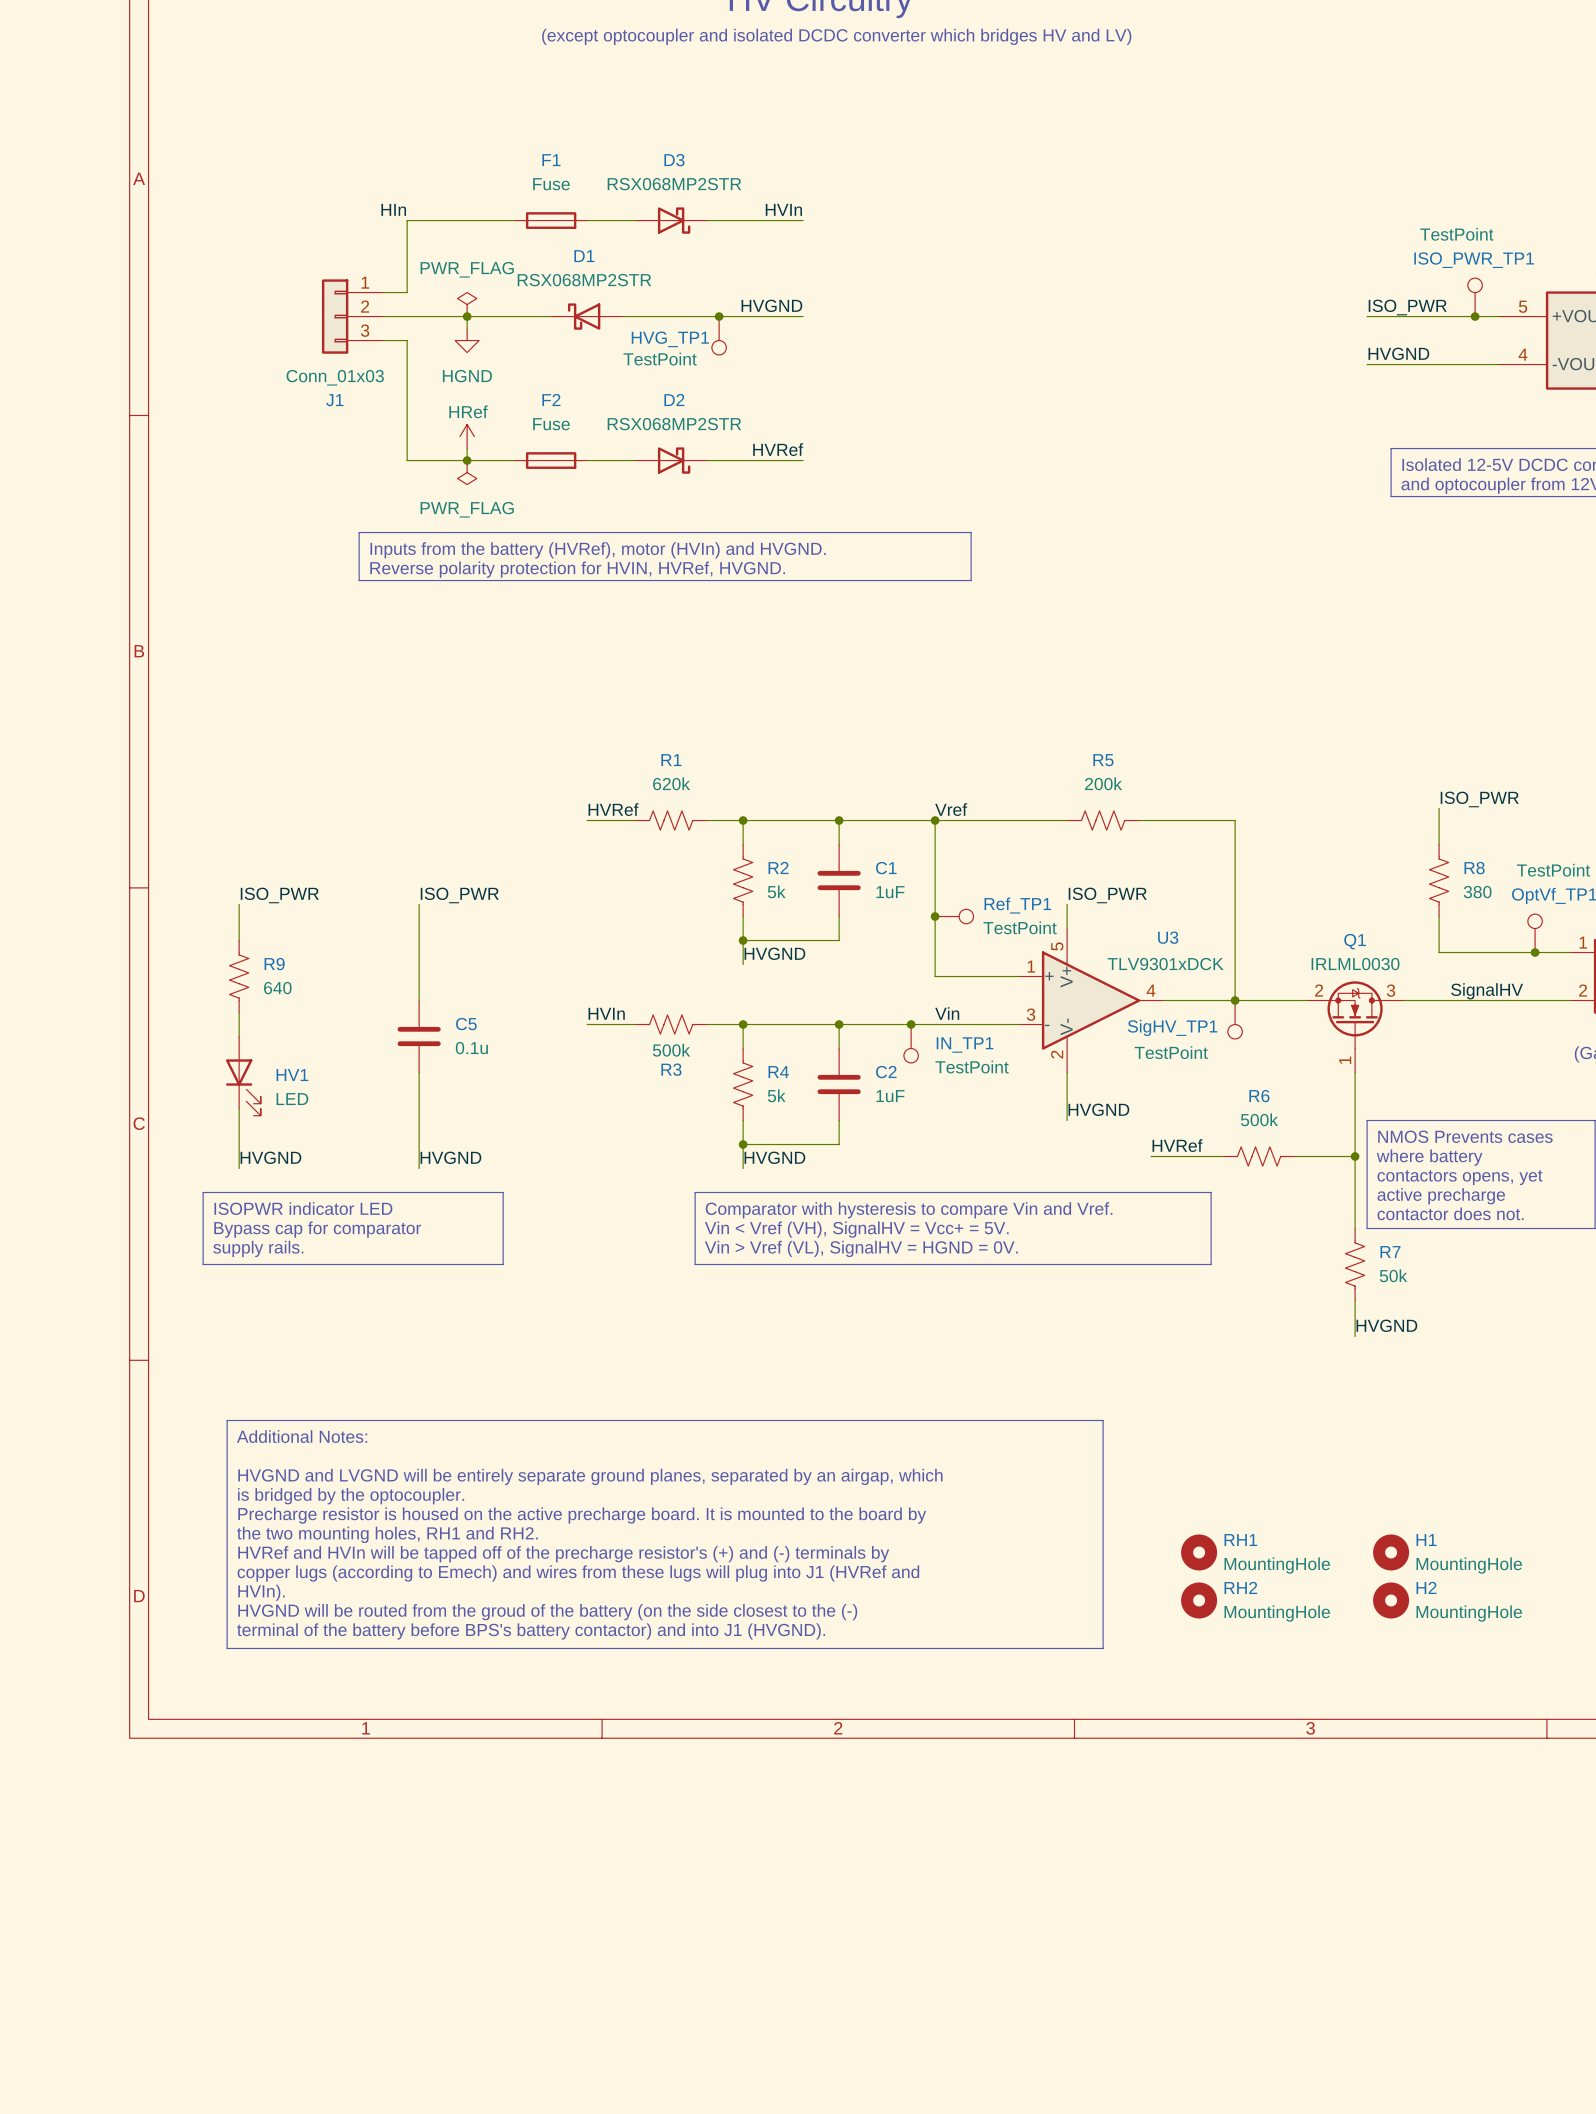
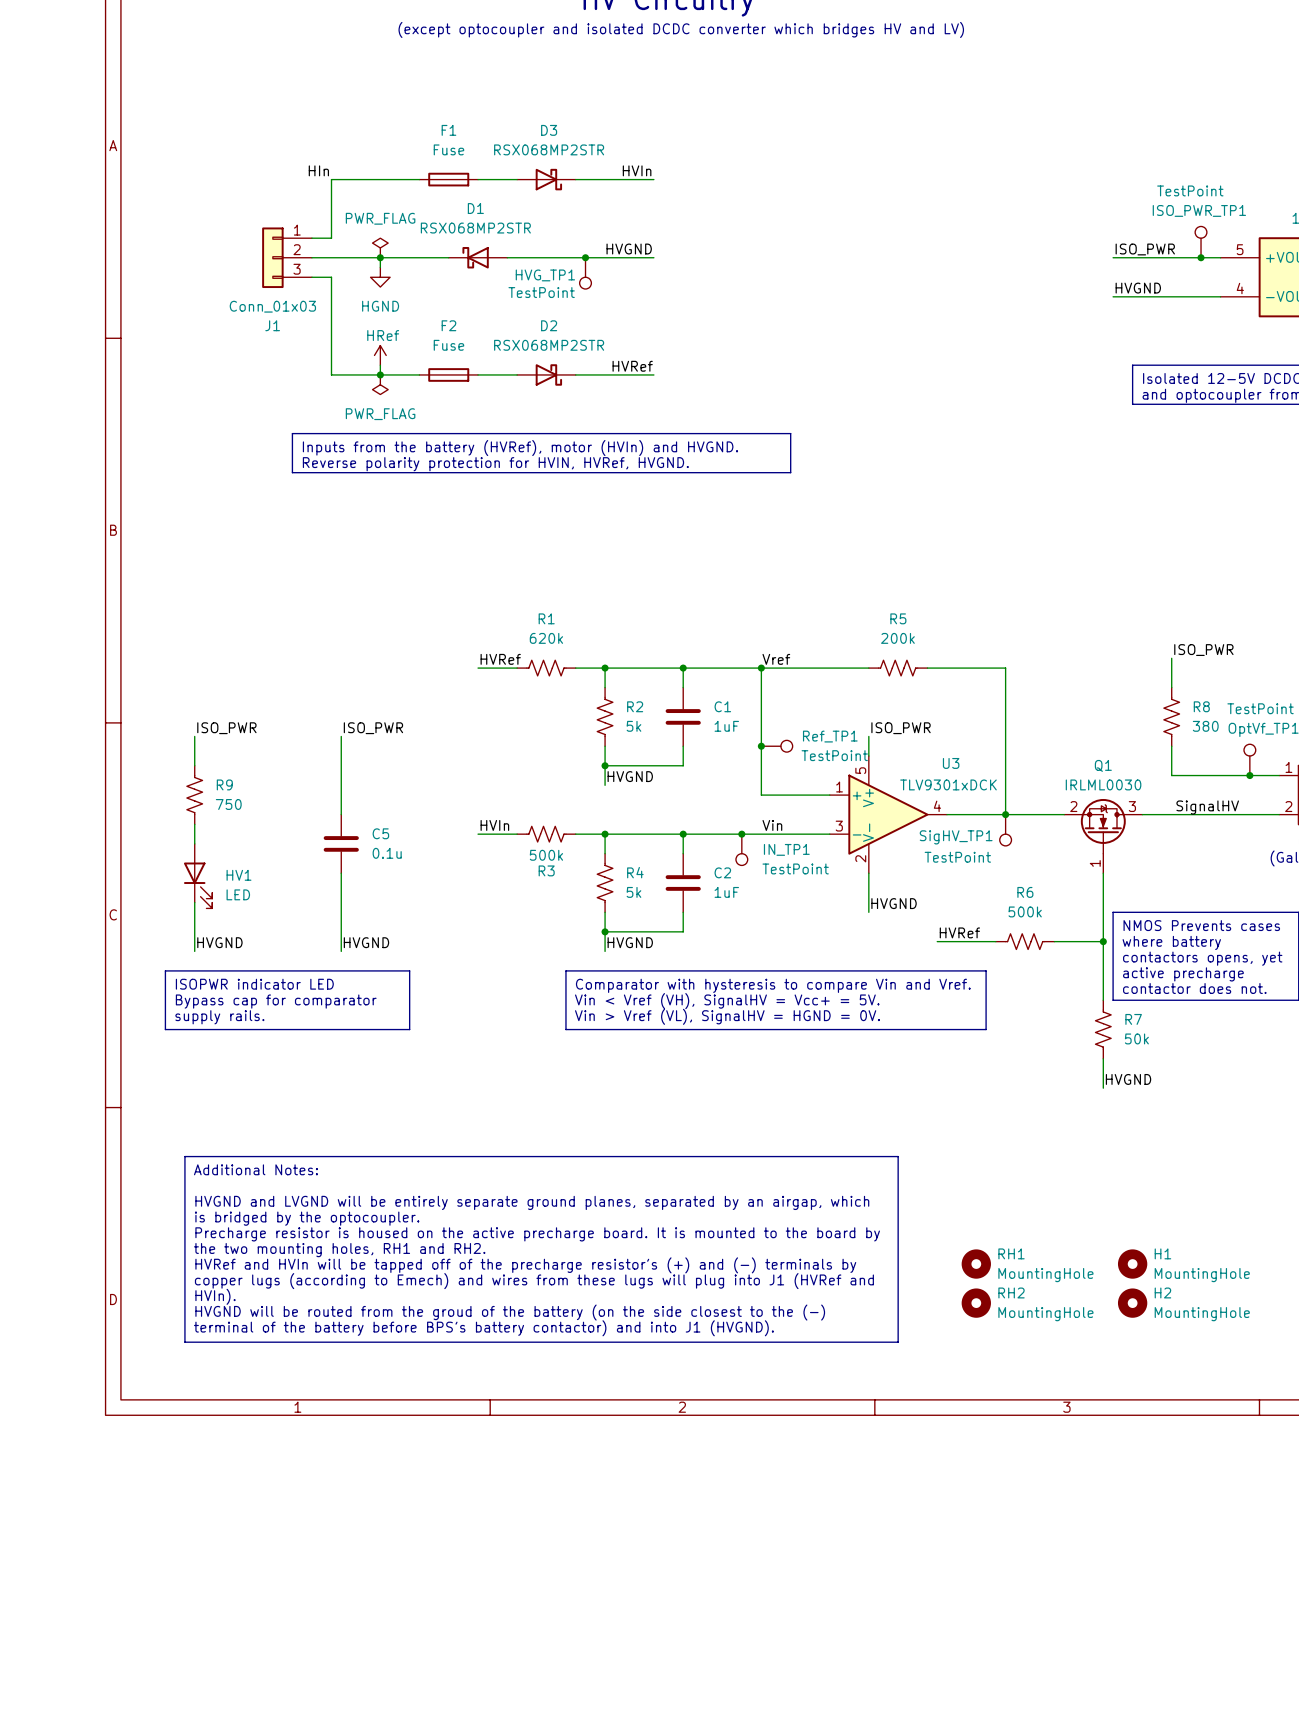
R9 value: 640 (277, 988) -> 750 (228, 804)

